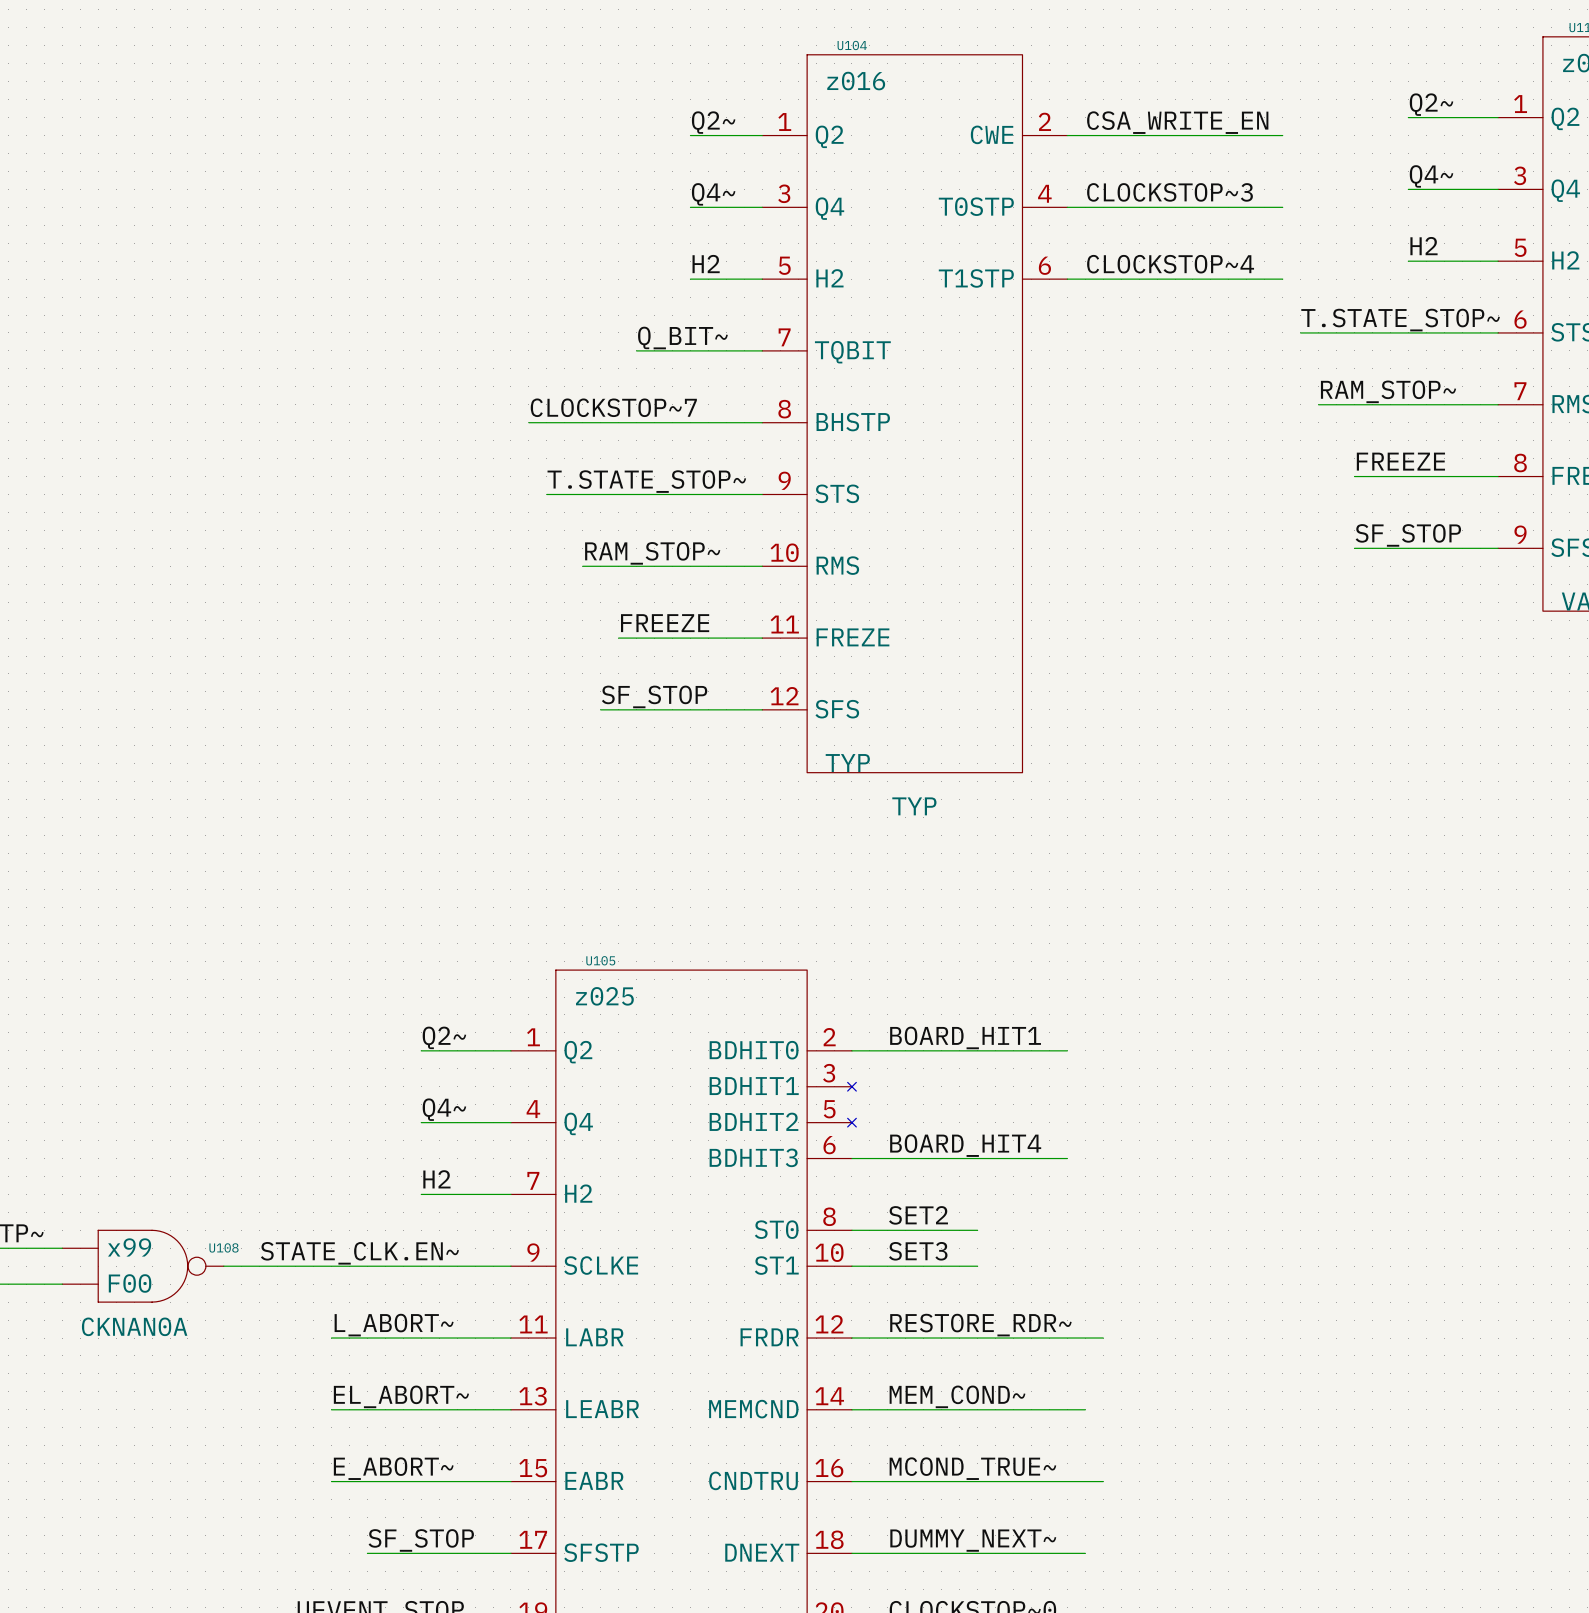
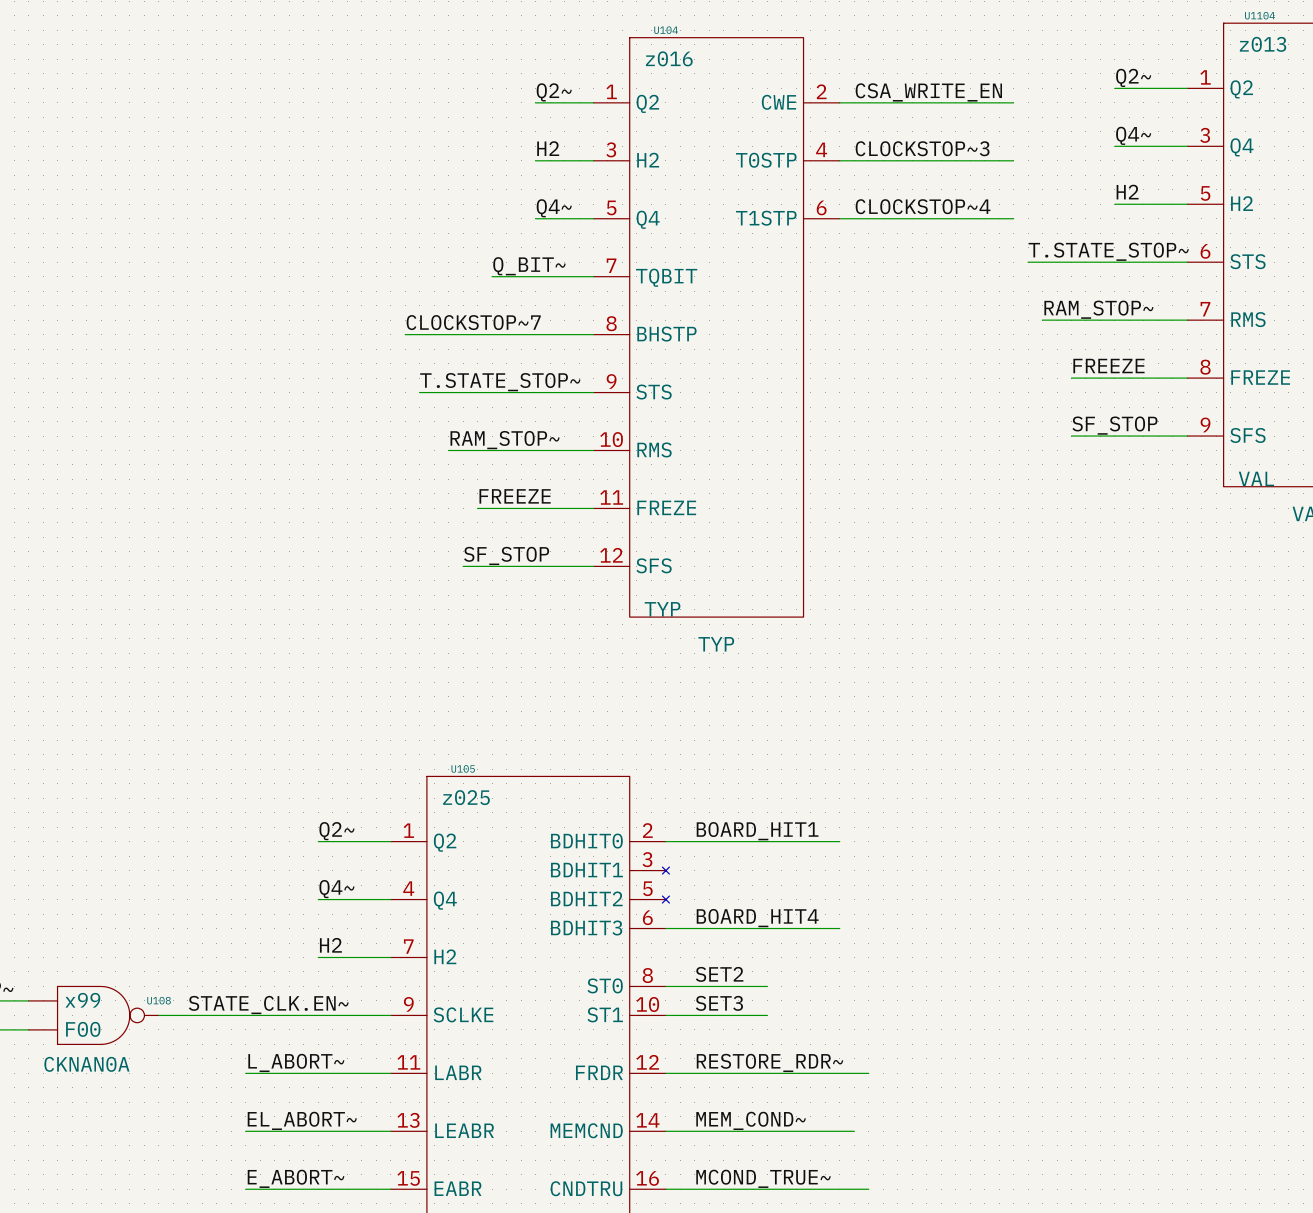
label: Q4~ (713, 194) -> H2 (548, 148)
U104 pin name: Q4 (829, 208) -> H2 (648, 160)
label: H2 (706, 264) -> Q4~ (554, 208)
U104 pin name: H2 (829, 278) -> Q4 (648, 219)

